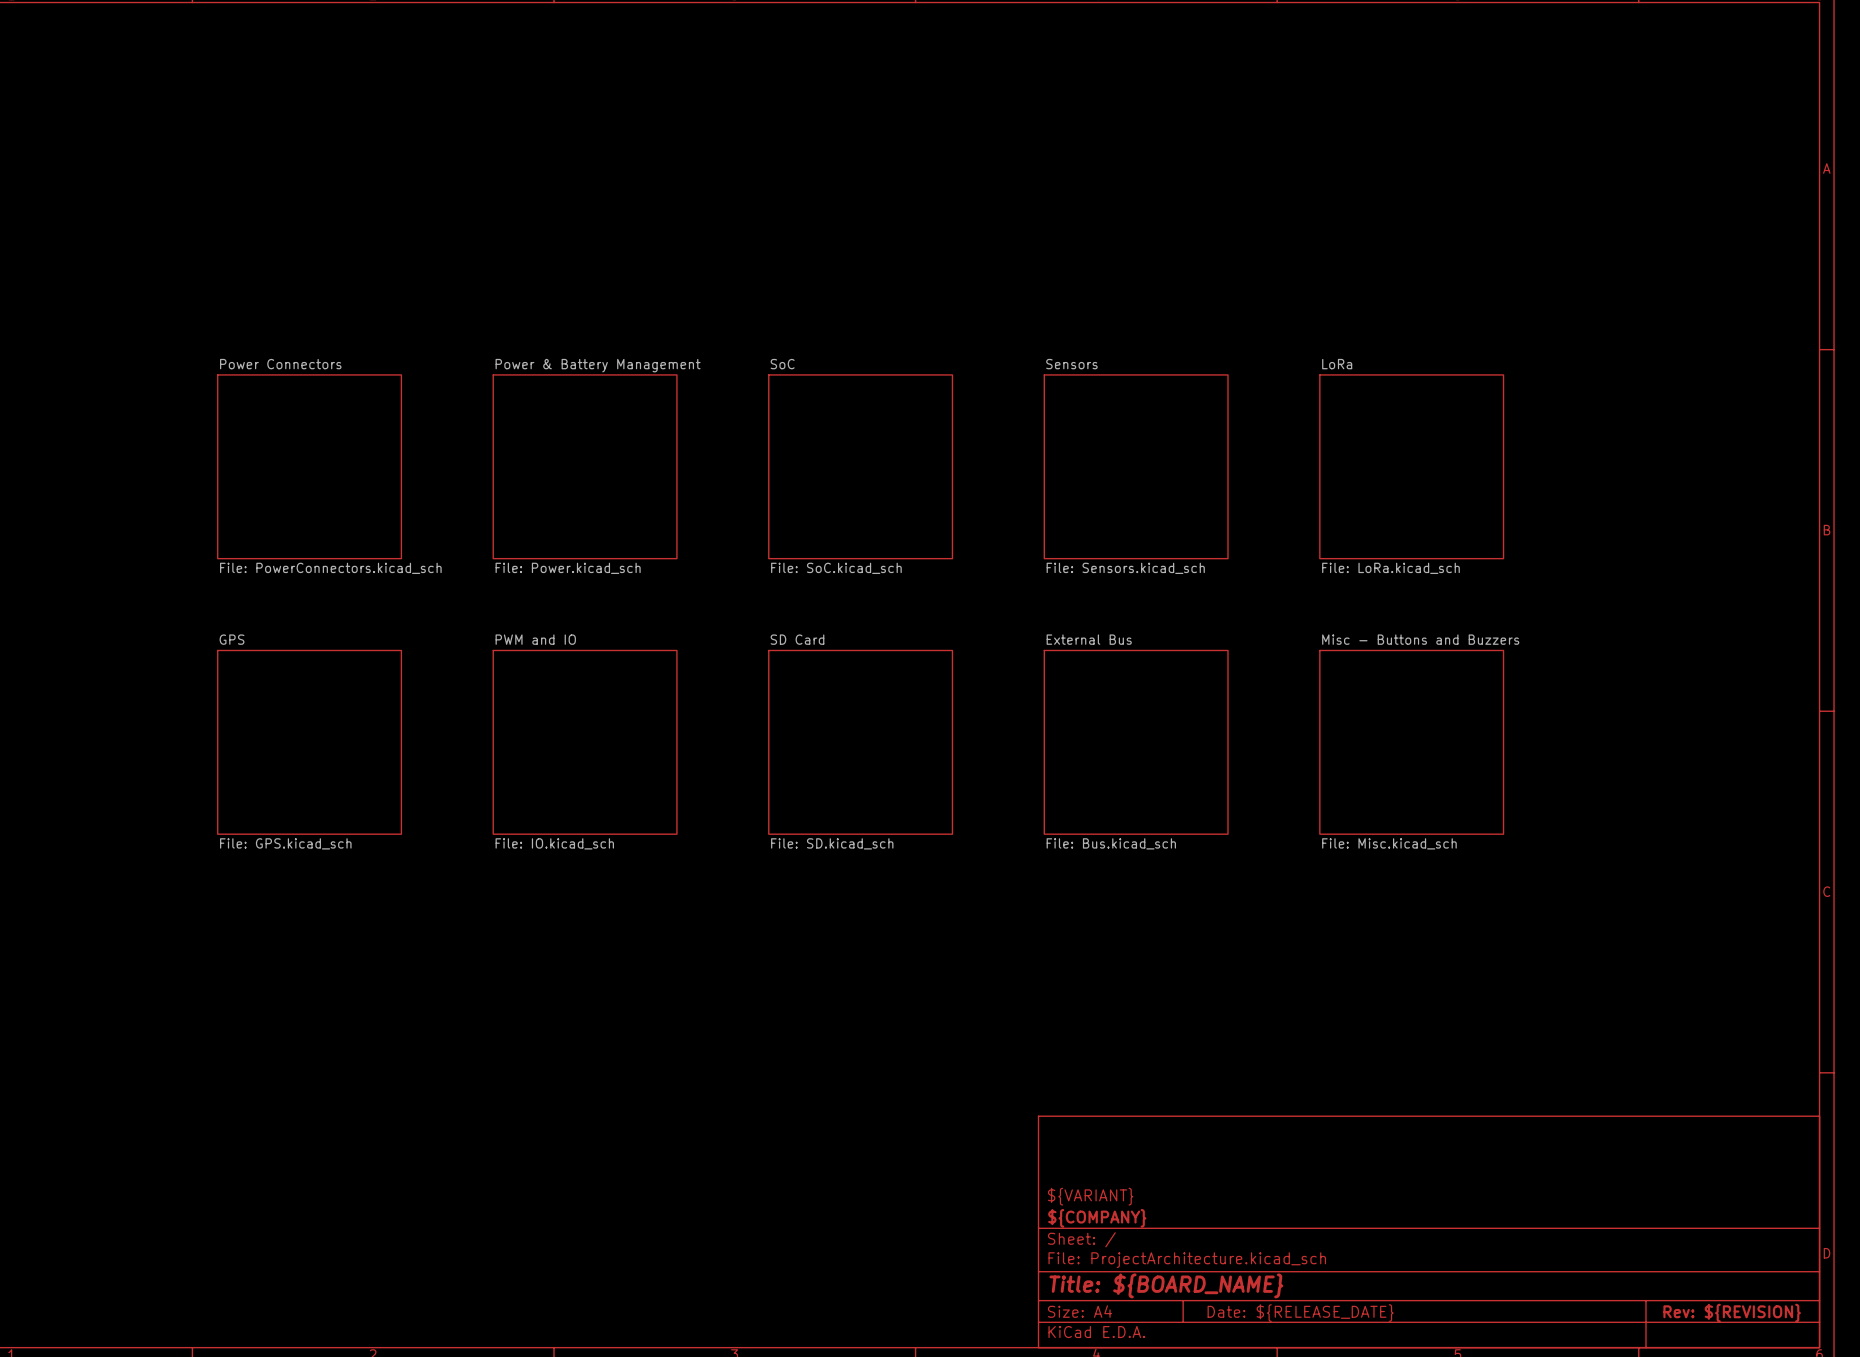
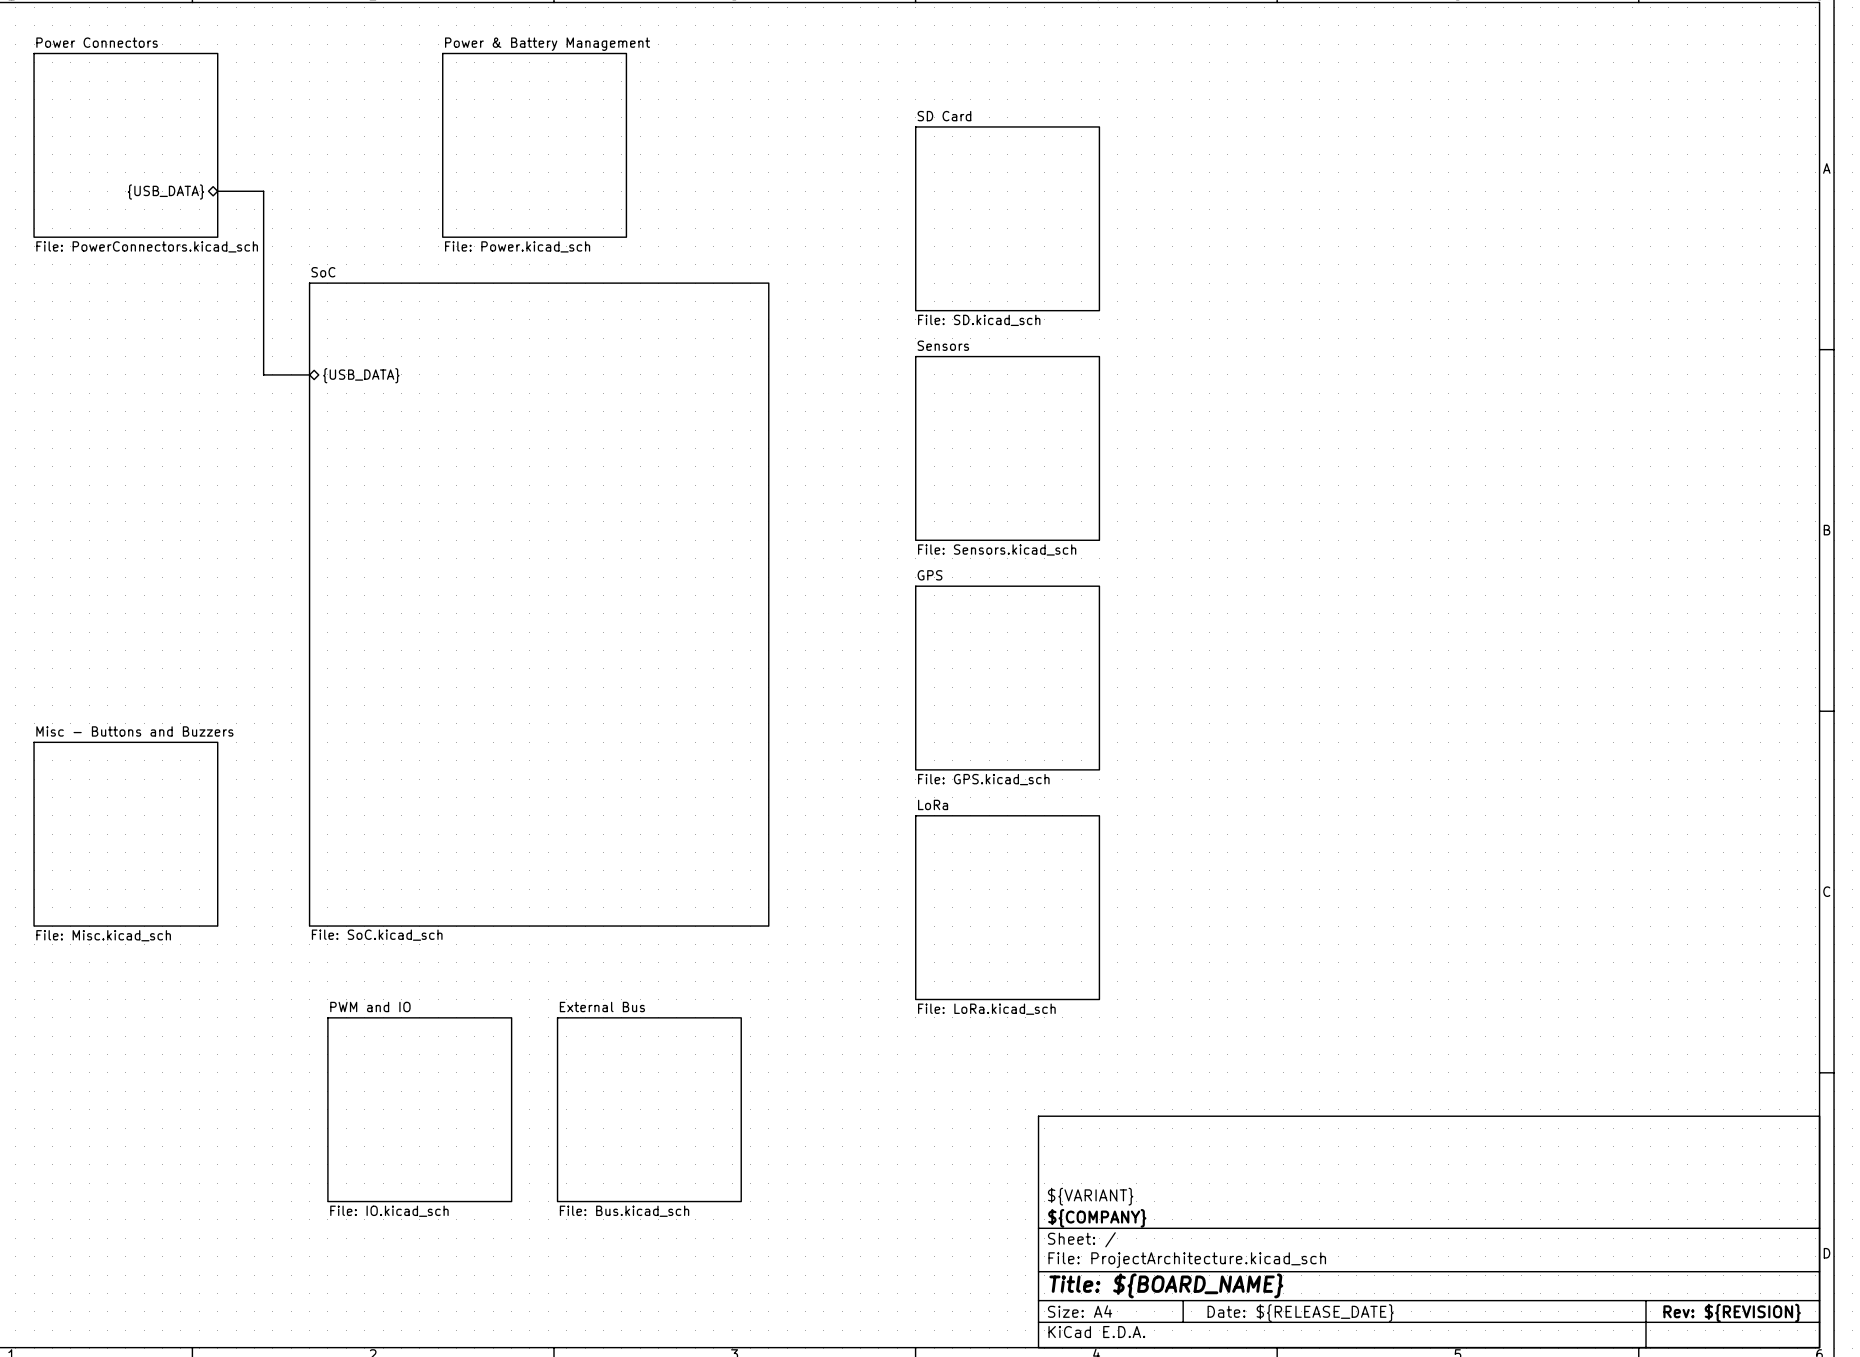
sheet Power Connectors: none -> File: PowerConnectors.kicad_sch (125, 145)
sheet Power & Battery Management: none -> File: Power.kicad_sch (534, 145)
bus: none -> (217, 191) (263, 191) (263, 374) (309, 374)
sheet pin: none -> {USB_DATA} (165, 192)
sheet SD Card: none -> File: SD.kicad_sch (1007, 218)
sheet pin: none -> {USB_DATA} (361, 375)
sheet Power Connectors: File: PowerConnectors.kicad_sch (309, 466) -> none
sheet Power & Battery Management: File: Power.kicad_sch (585, 466) -> none
sheet SoC: File: SoC.kicad_sch (860, 466) -> none
sheet Sensors position: (1136, 466) -> (1007, 448)
sheet LoRa: File: LoRa.kicad_sch (1411, 466) -> none
sheet SoC: none -> File: SoC.kicad_sch (539, 604)
sheet GPS: none -> File: GPS.kicad_sch (1007, 678)
sheet GPS: File: GPS.kicad_sch (309, 742) -> none
sheet PWM and IO: File: IO.kicad_sch (585, 742) -> none
sheet SD Card: File: SD.kicad_sch (860, 742) -> none
sheet External Bus: File: Bus.kicad_sch (1136, 742) -> none
sheet Misc - Buttons and Buzzers: File: Misc.kicad_sch (1411, 742) -> none
sheet Misc - Buttons and Buzzers: none -> File: Misc.kicad_sch (125, 834)
sheet LoRa: none -> File: LoRa.kicad_sch (1007, 907)
sheet PWM and IO: none -> File: IO.kicad_sch (419, 1109)
sheet External Bus: none -> File: Bus.kicad_sch (649, 1109)

